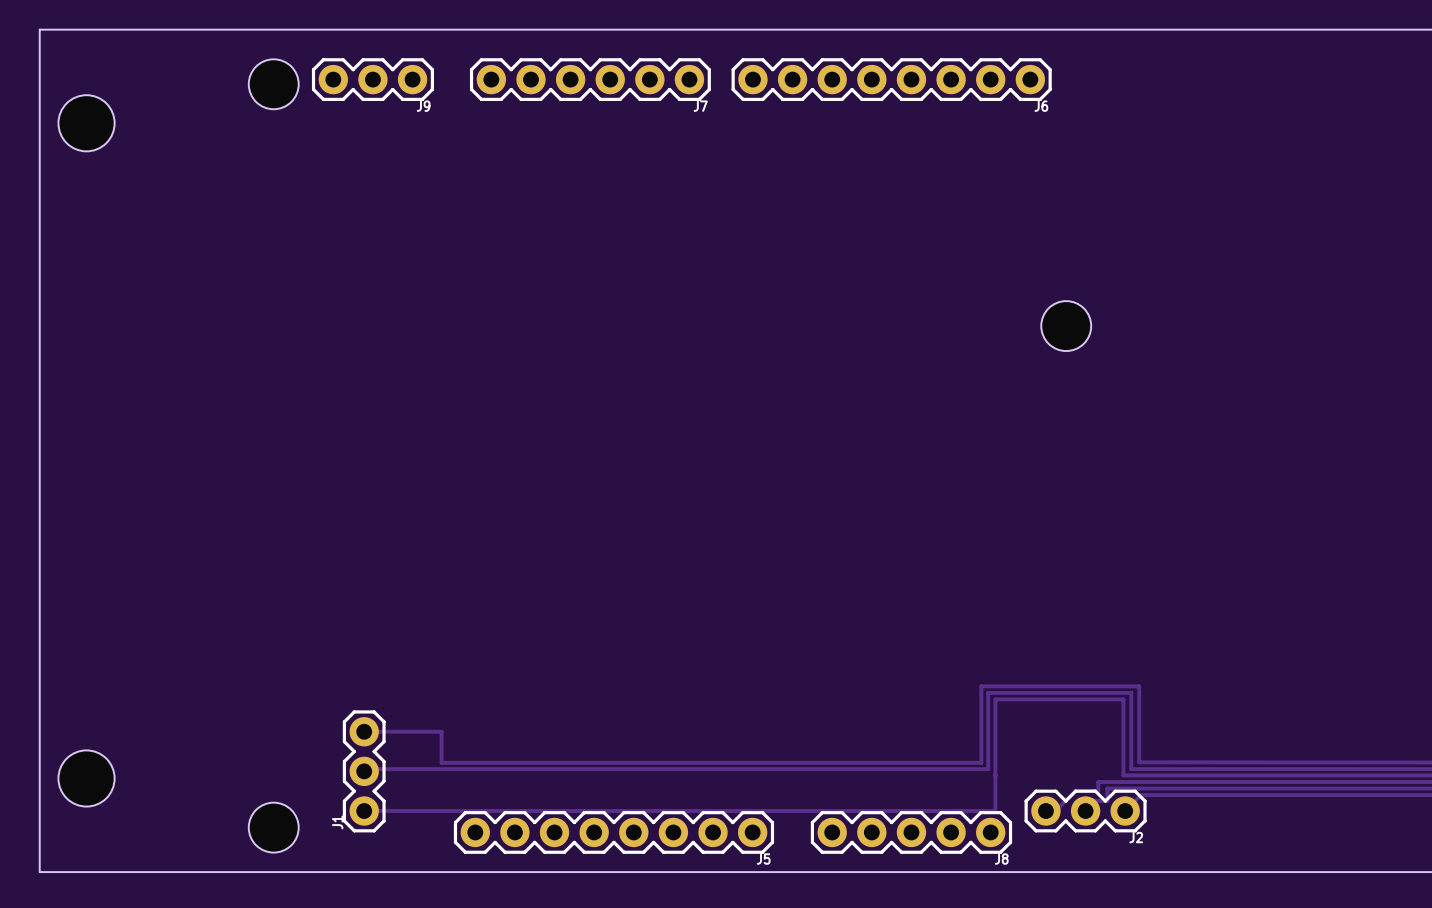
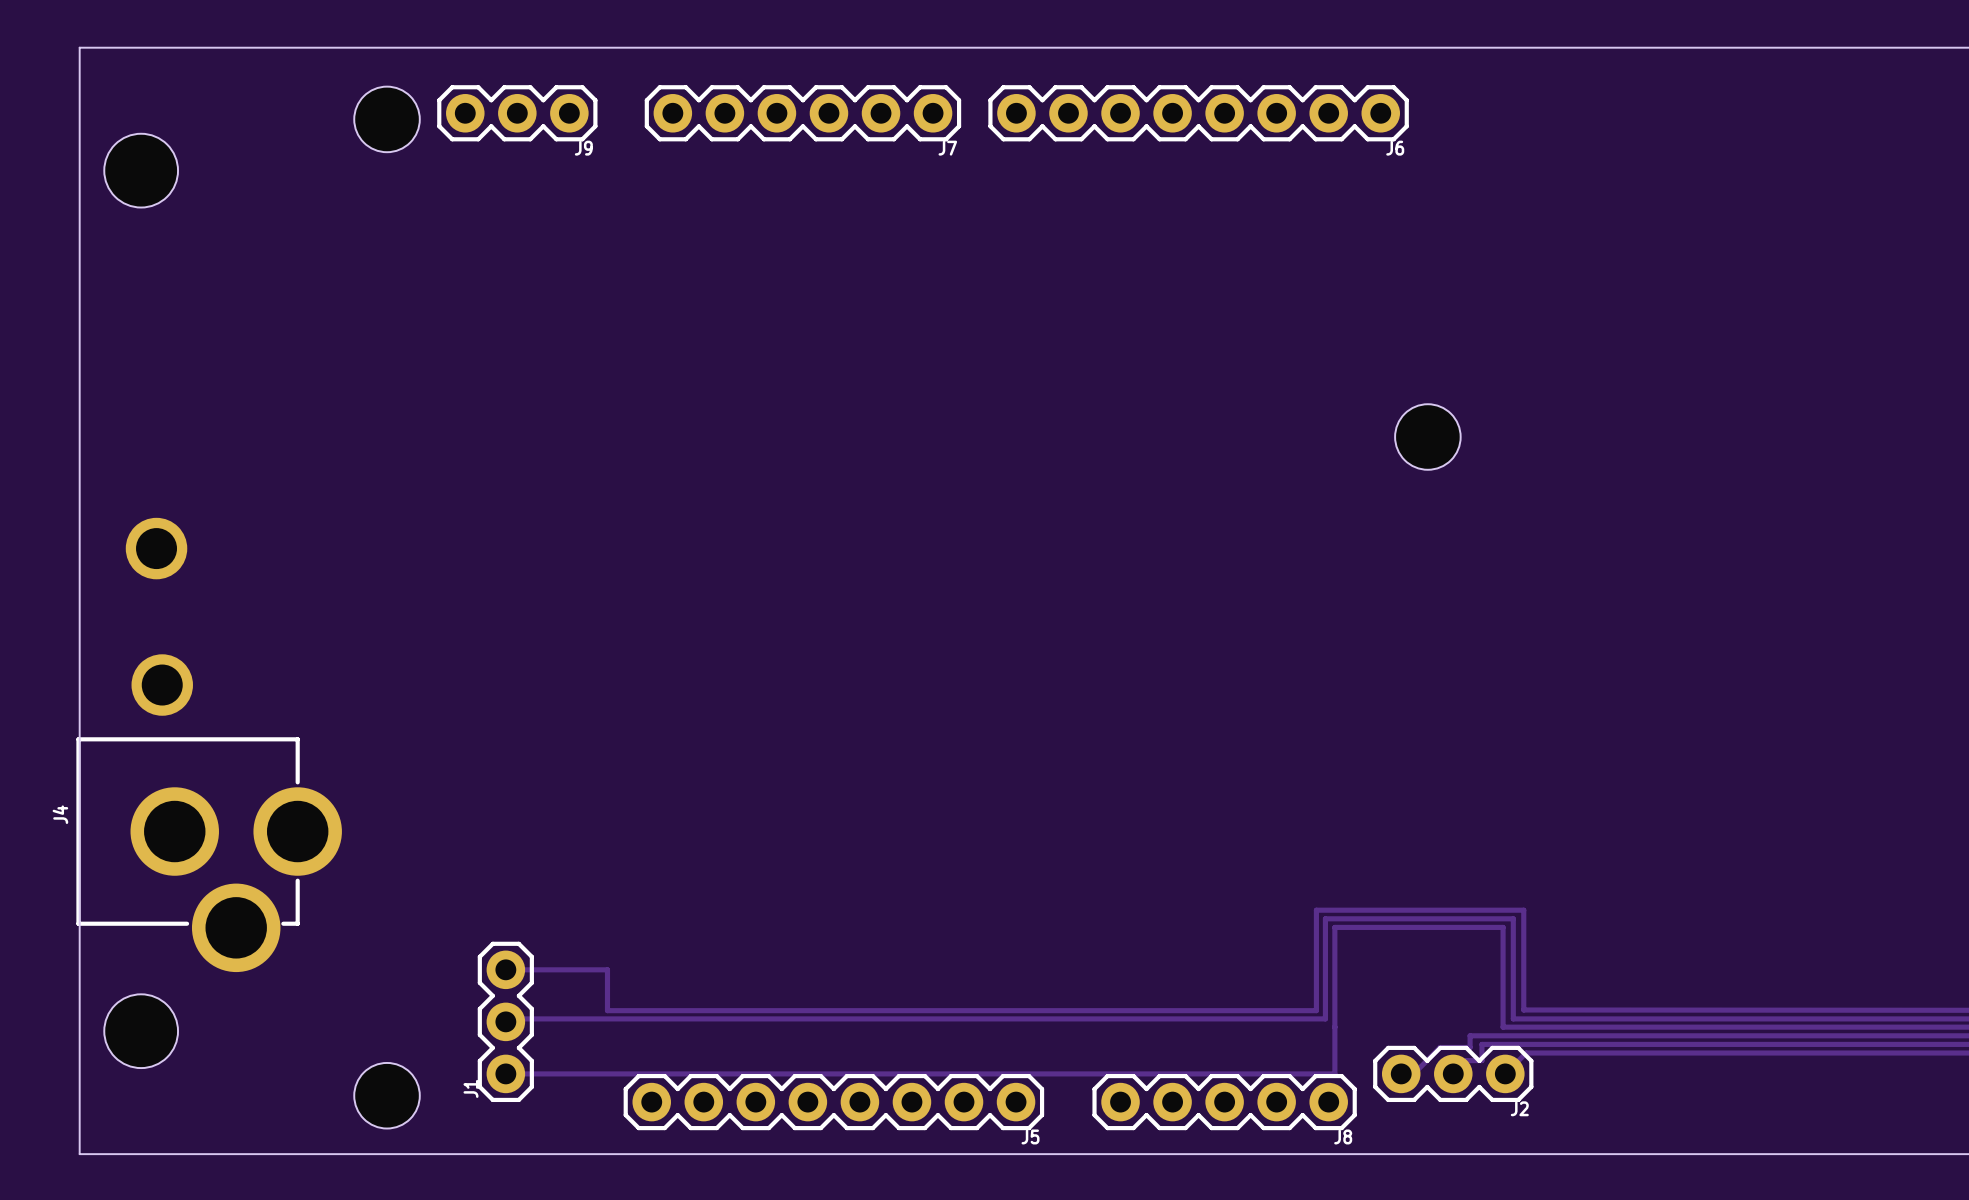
part: none -> (156, 548)
part: none -> (162, 685)
J4: none -> (209, 854)

